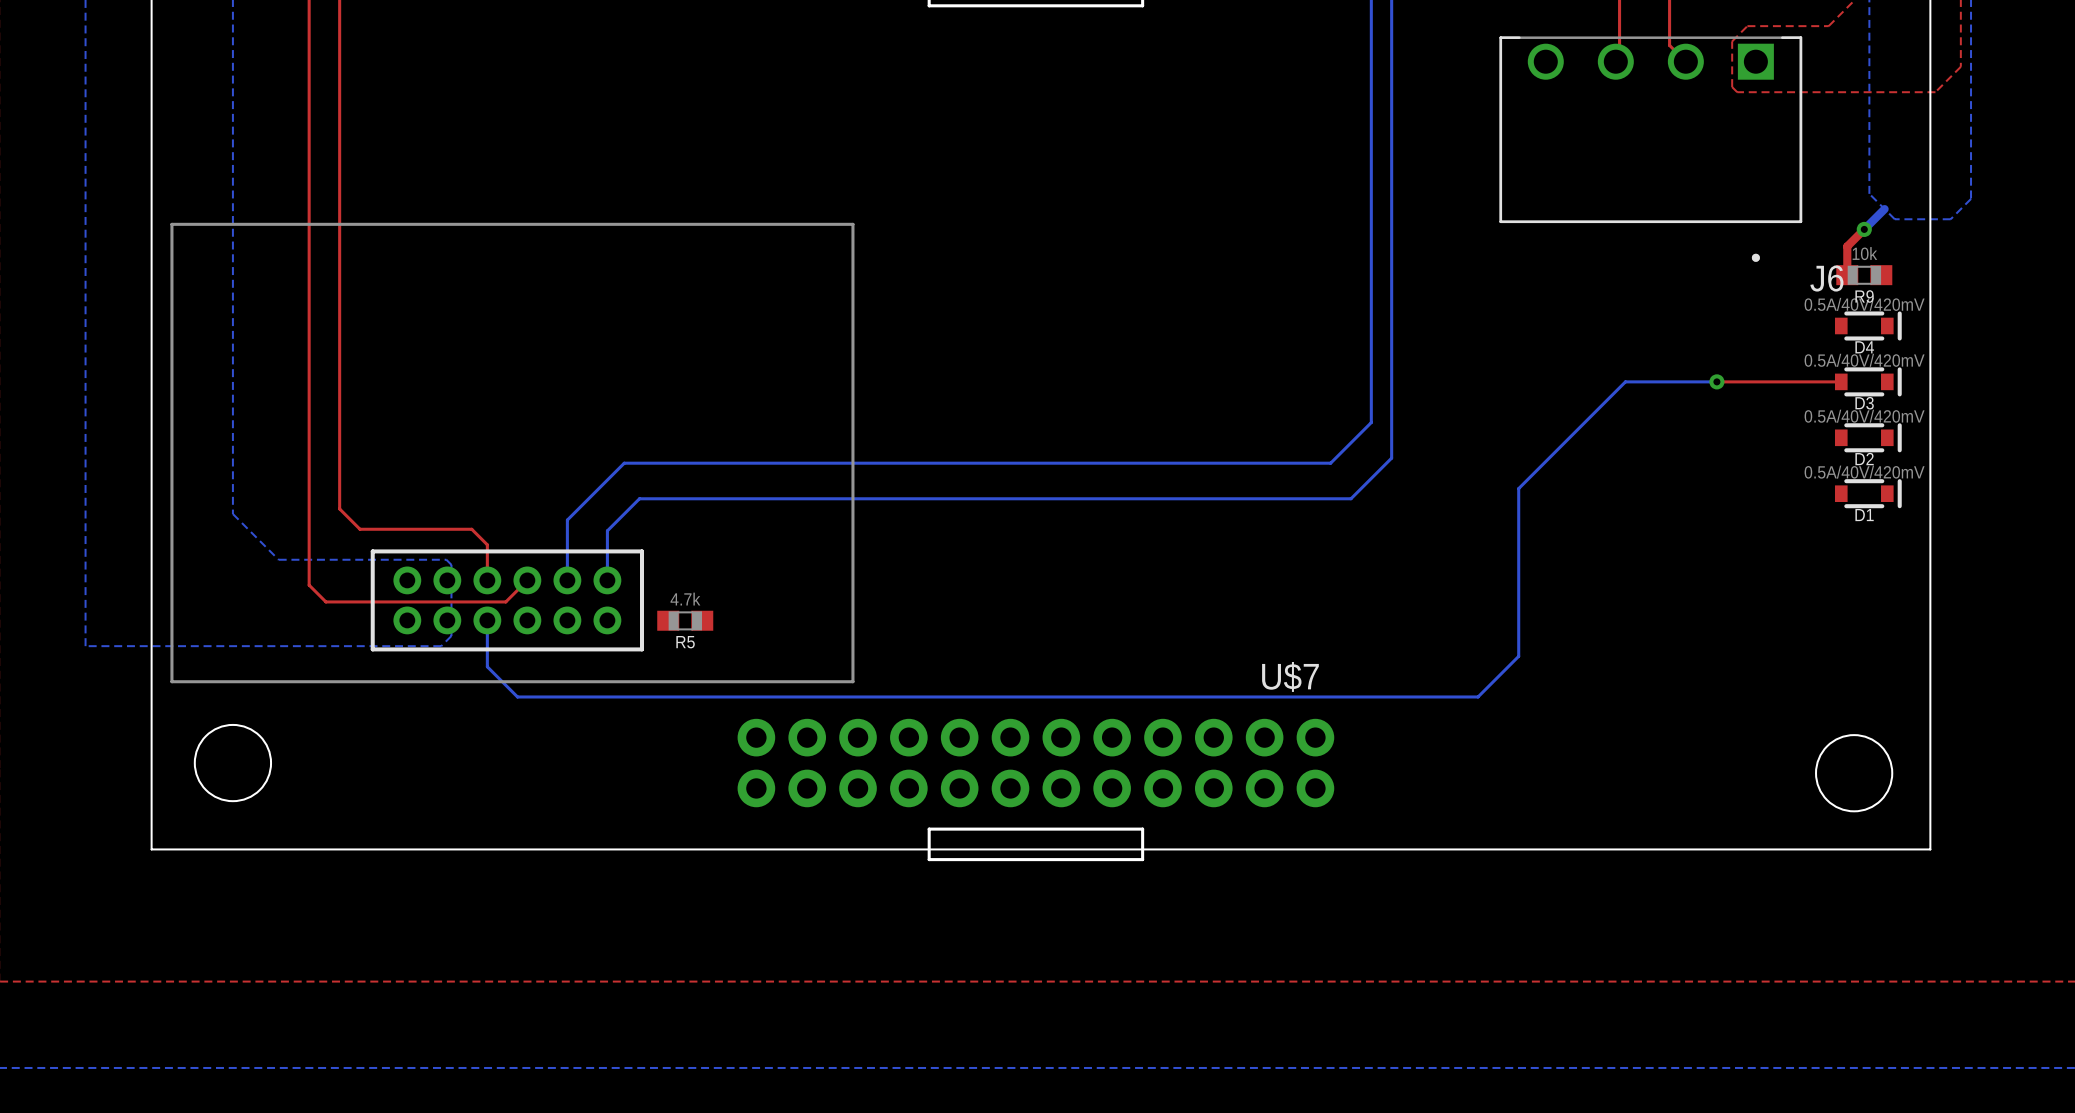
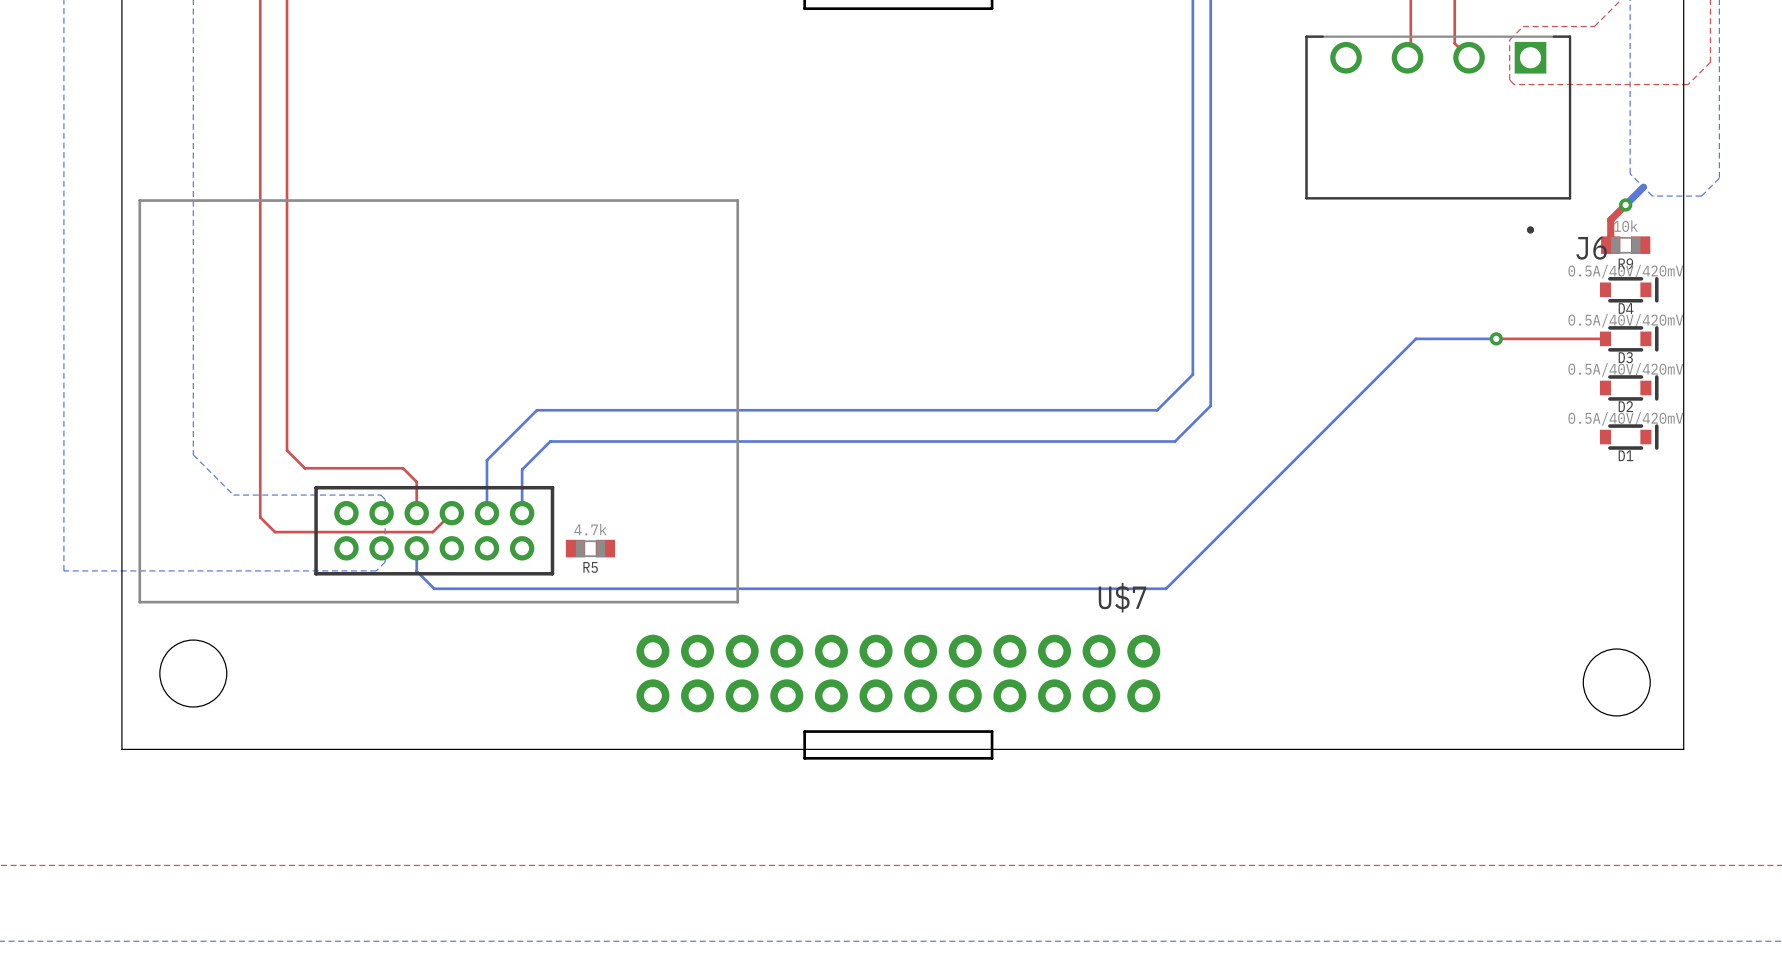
bottom track: (1518, 488) (1518, 656) (1478, 696) (517, 696) (487, 666) (487, 646) -> (1322, 432) (1166, 588) (434, 588) (416, 571)

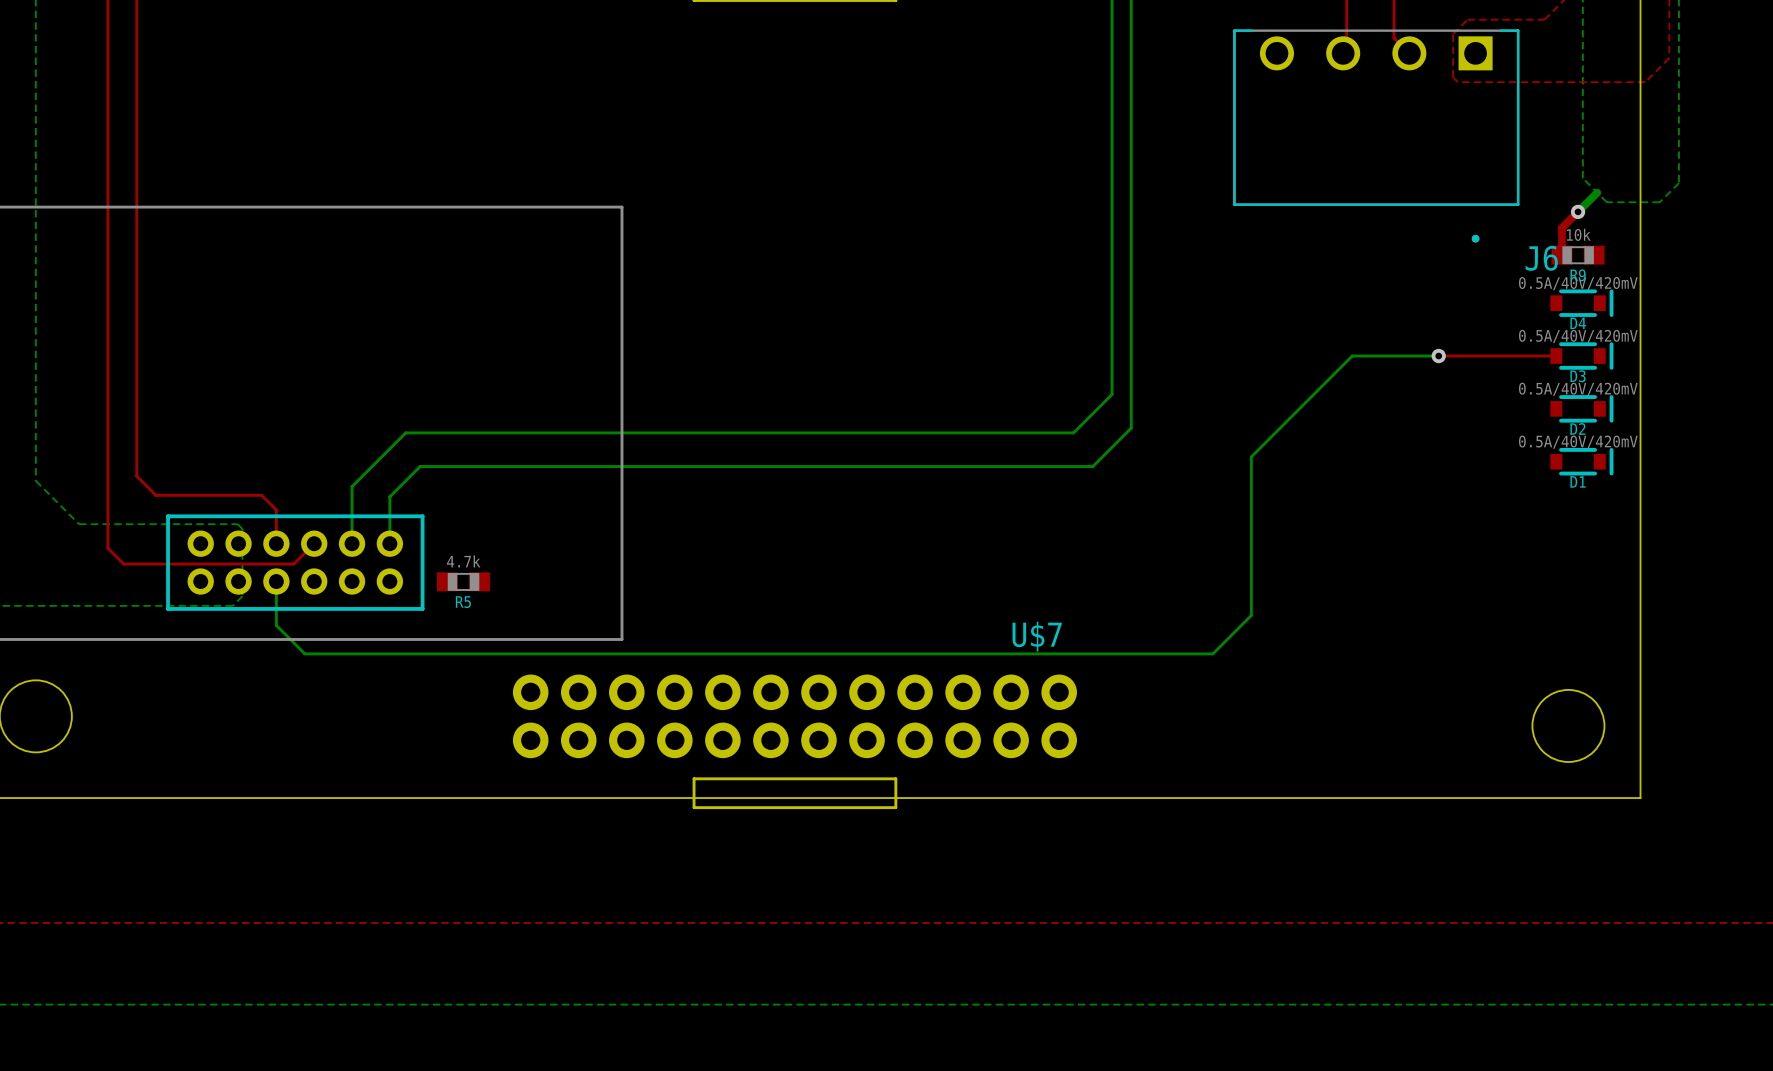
bottom track: (1322, 432) (1166, 588) (434, 588) (416, 571) -> (1251, 456) (1251, 615) (1212, 653) (304, 653) (276, 625) (276, 606)

